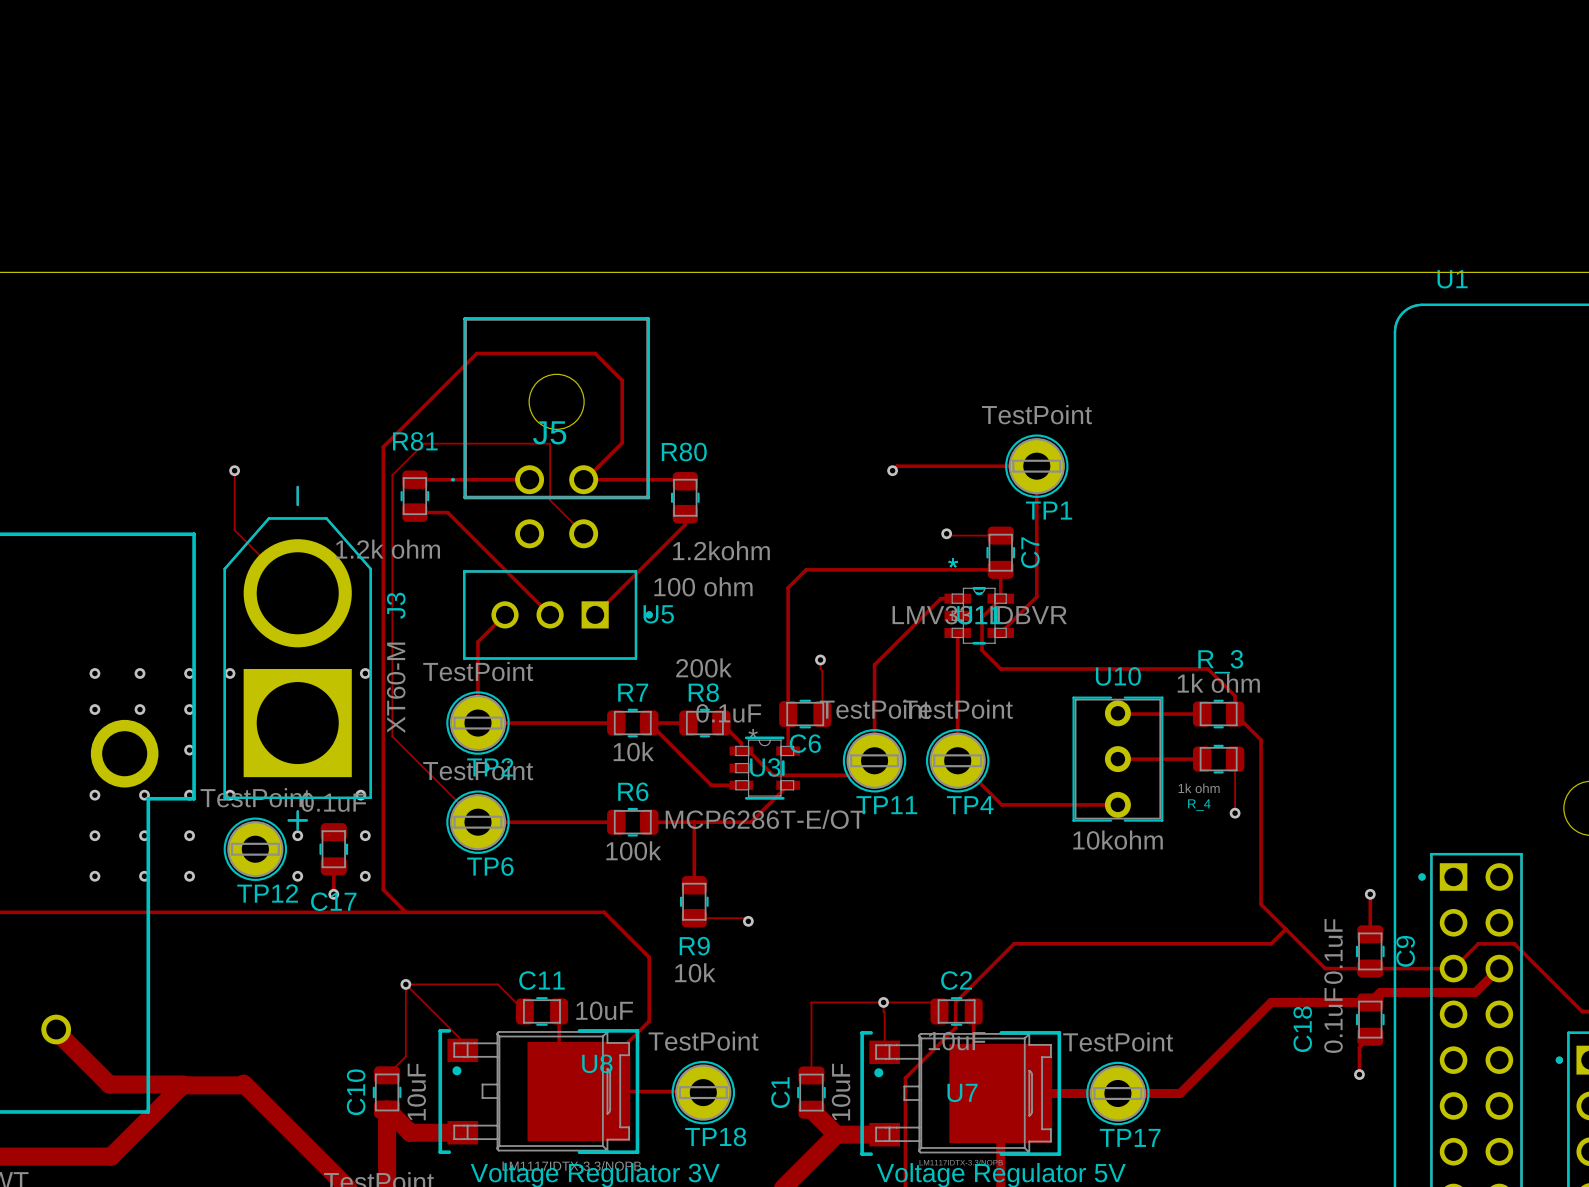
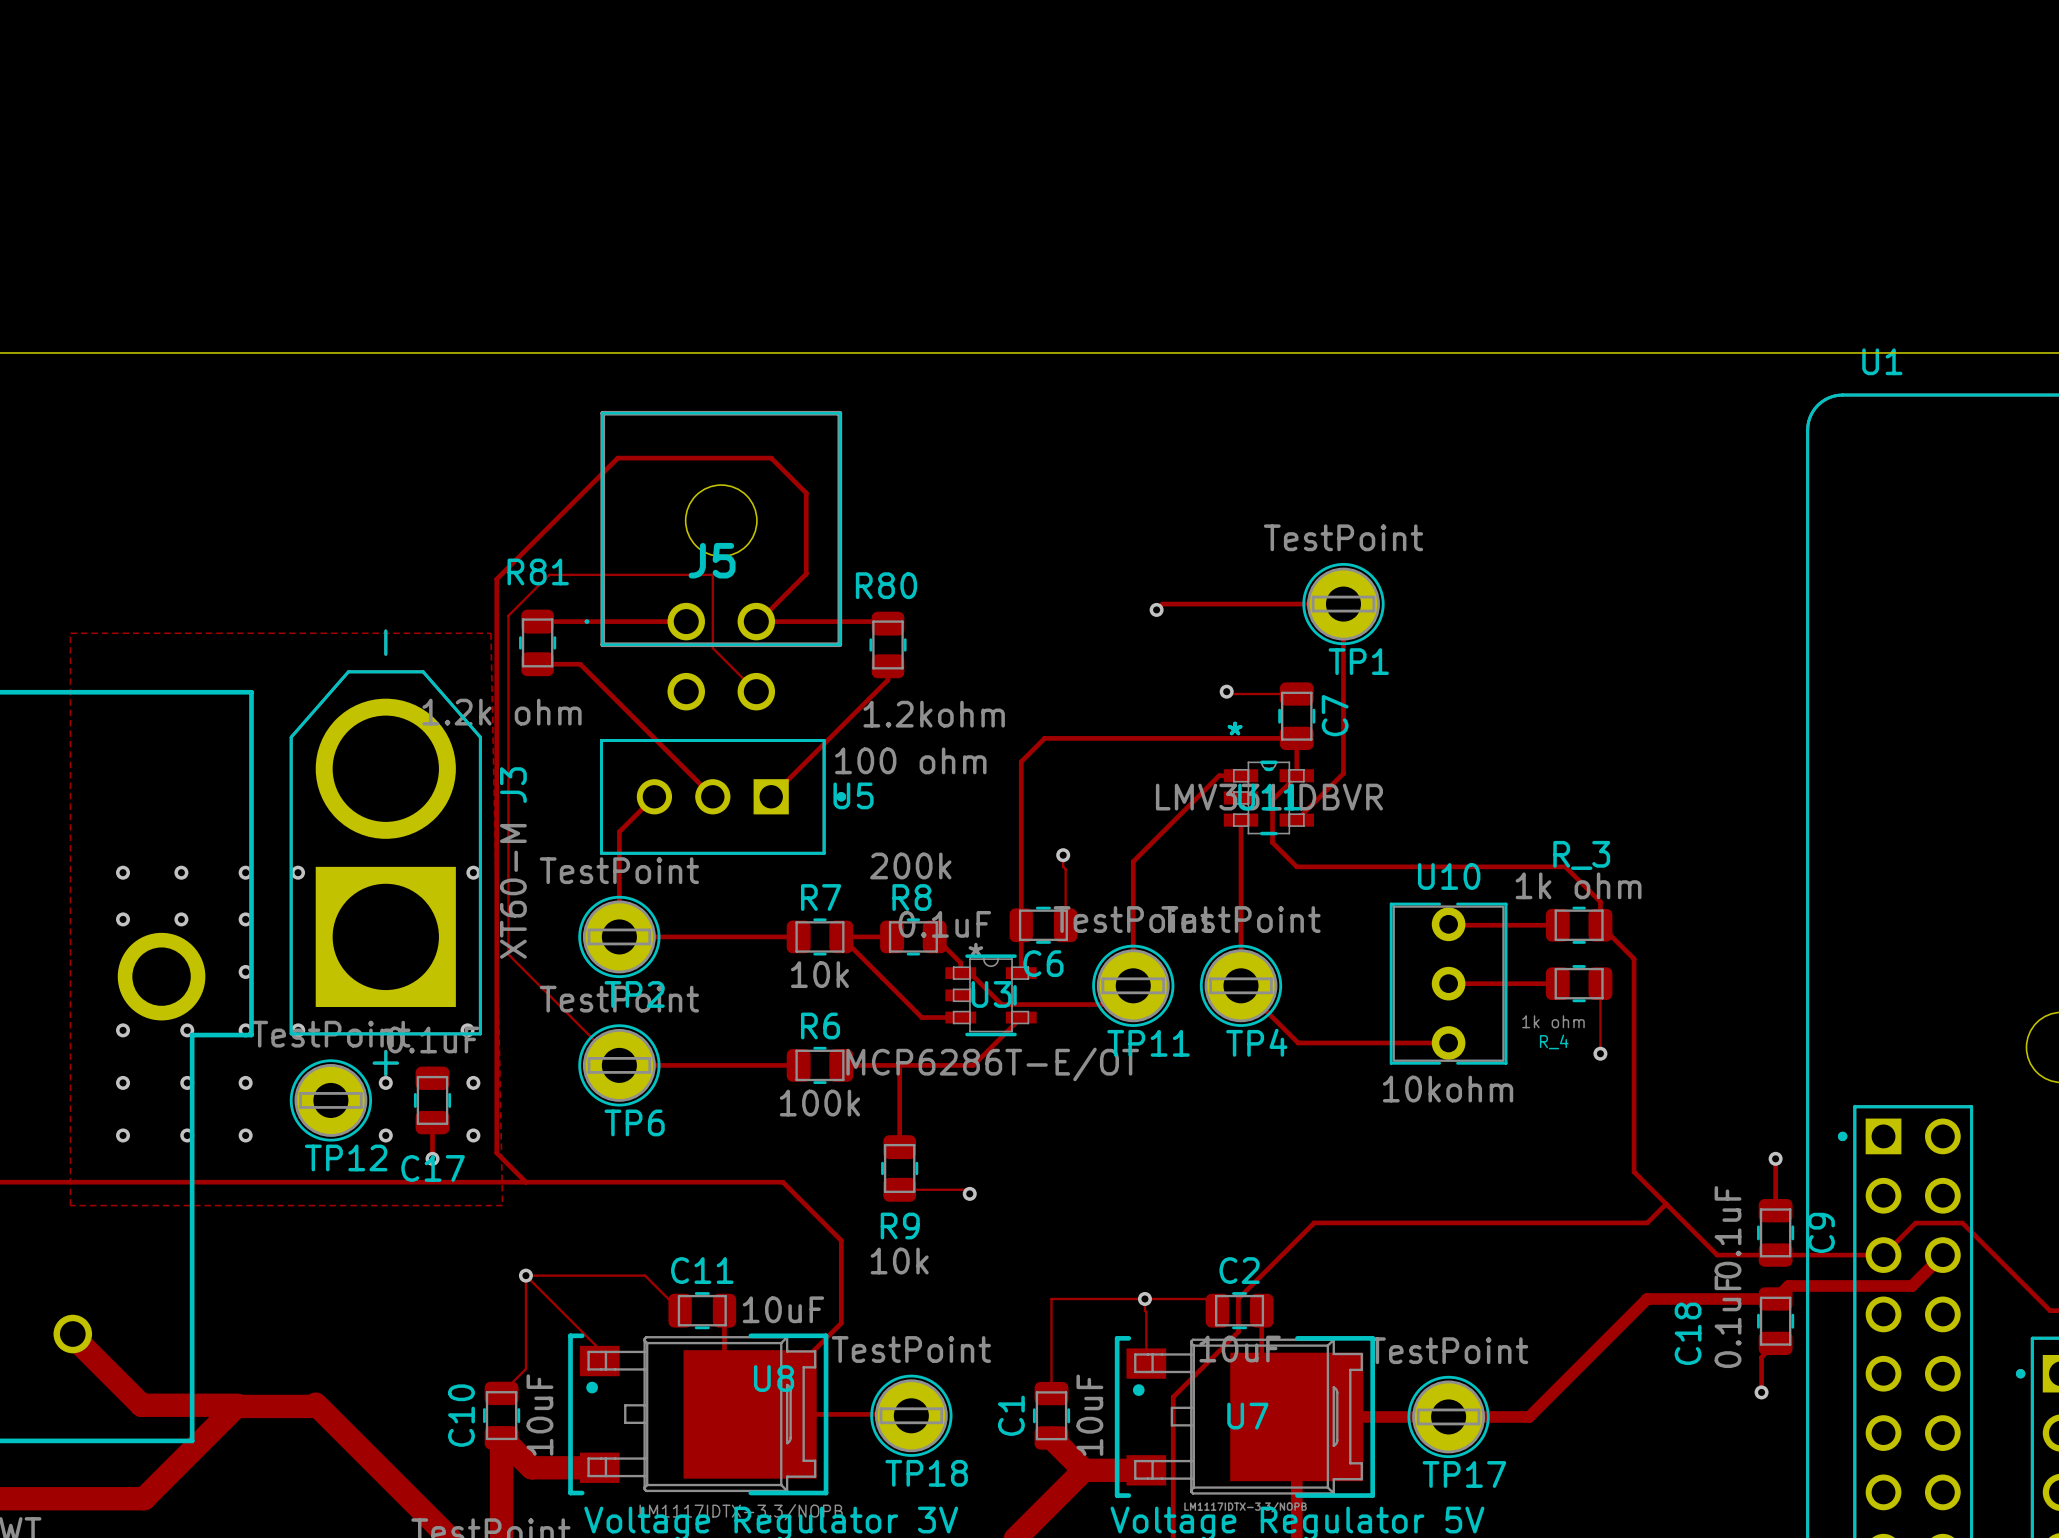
track: (234, 470) (234, 530) (297, 593) -> none
via: (234, 470) -> none
zone outline: none -> (70, 633) (490, 633) (502, 1205) (70, 1205) (70, 633)

